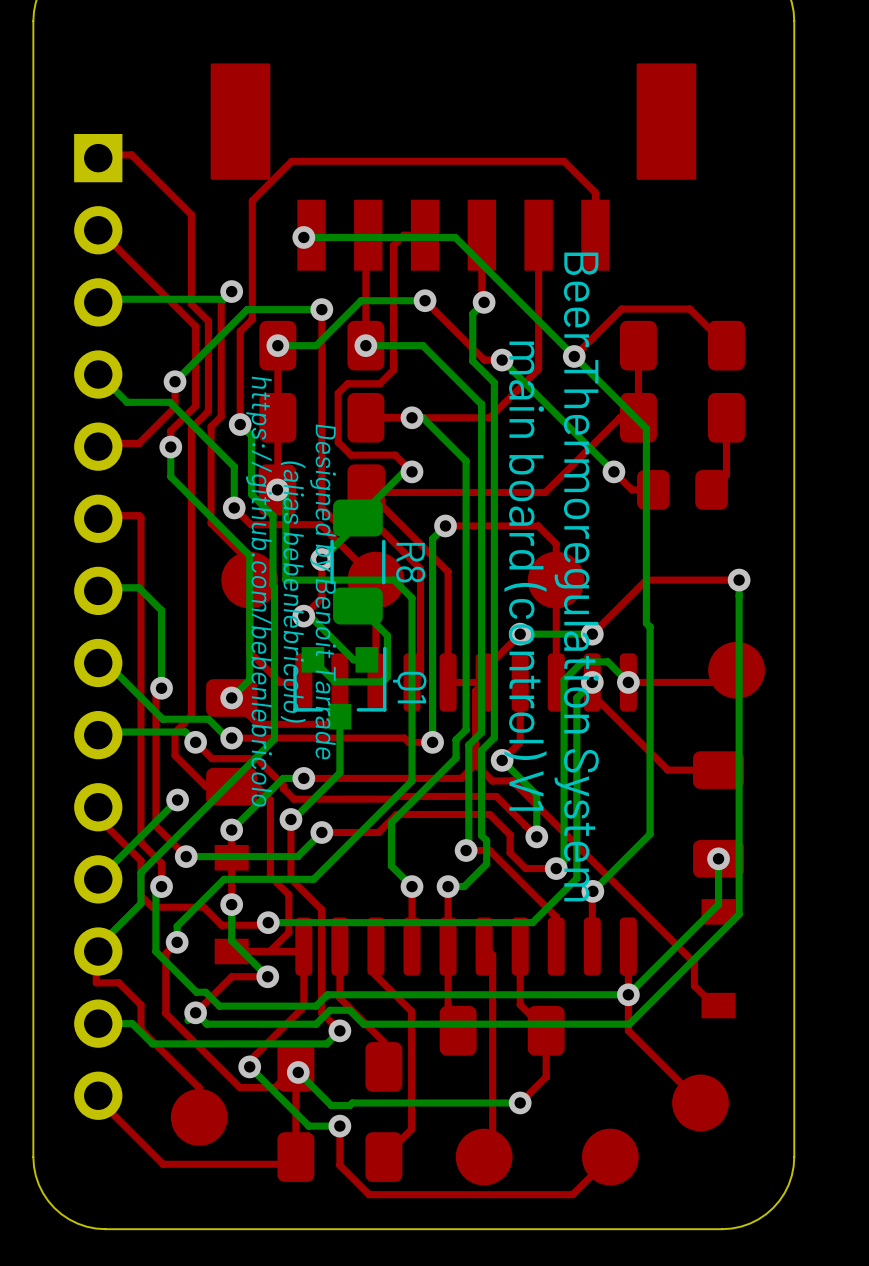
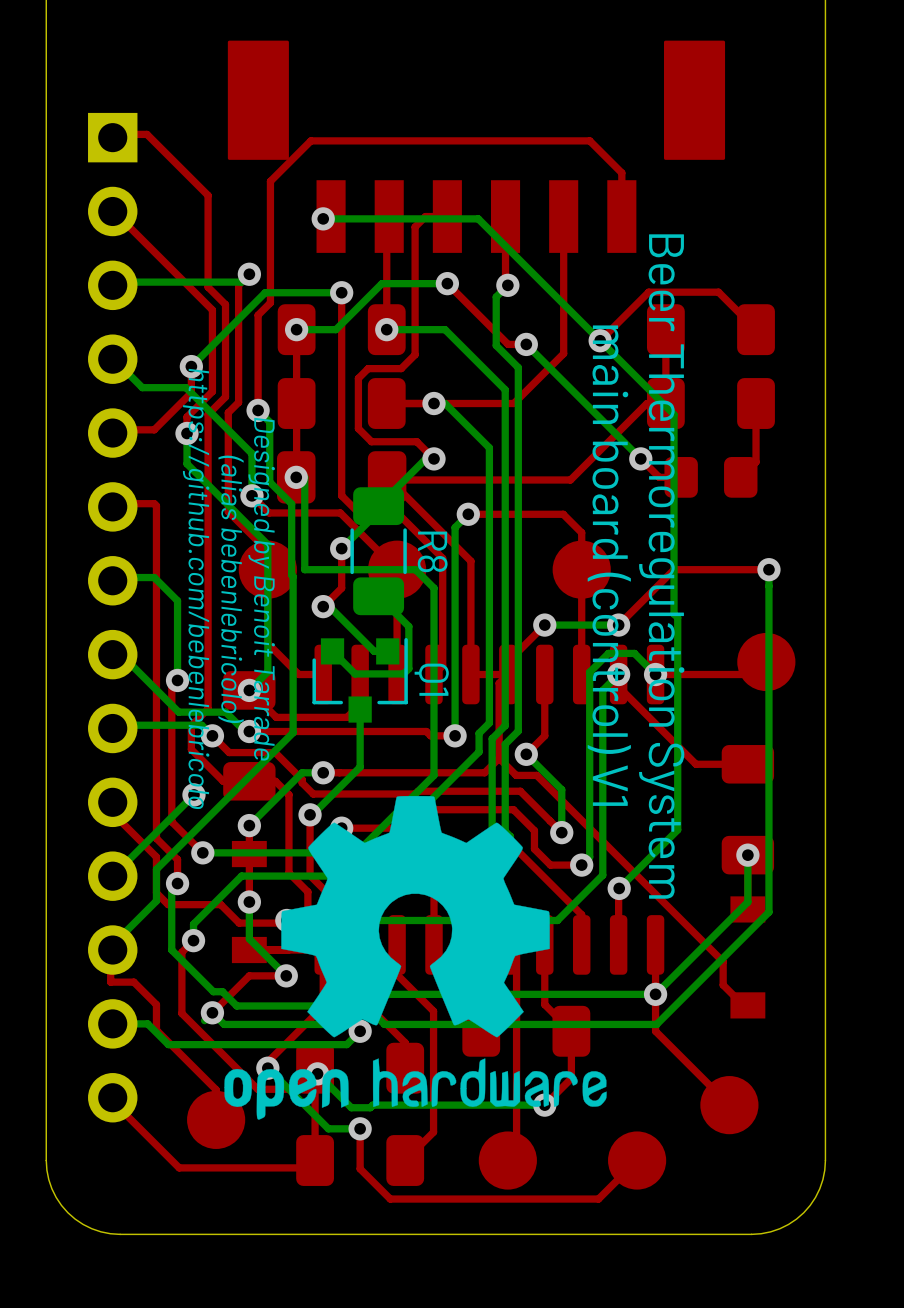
text: main board (control) V1 (525, 576) -> none
text: Beer Thermoregulation System (576, 576) -> main board (control) V1 (609, 565)
text: none -> Beer Thermoregulation System (661, 566)
text: https://github.com/bebenlebricolo (259, 591) -> Designed by Benoit Tarrade (261, 589)
text: Designed by Benoit Tarrade (323, 591) -> none
text position: (alias bebenlebricolo) (293, 592) -> (alias bebenlebricolo) (231, 589)
text: none -> https://github.com/bebenlebricolo (196, 588)
drawing: none -> [224, 795, 607, 1120]

